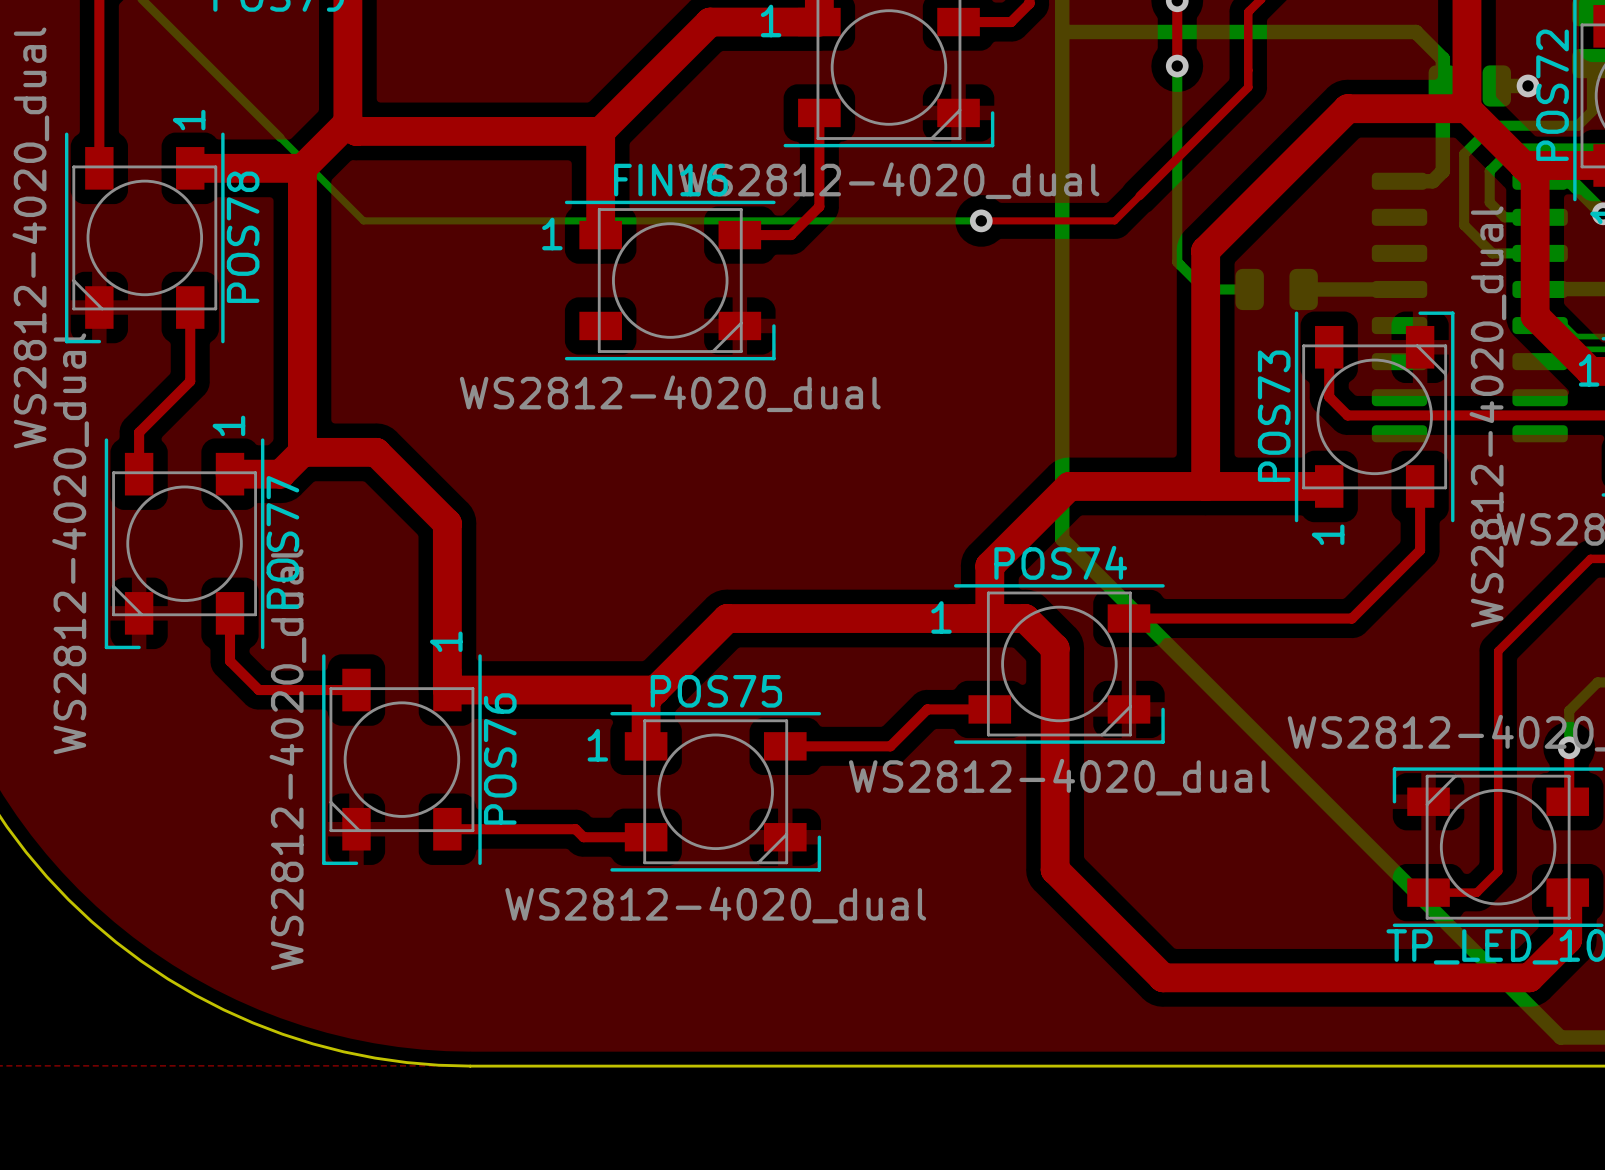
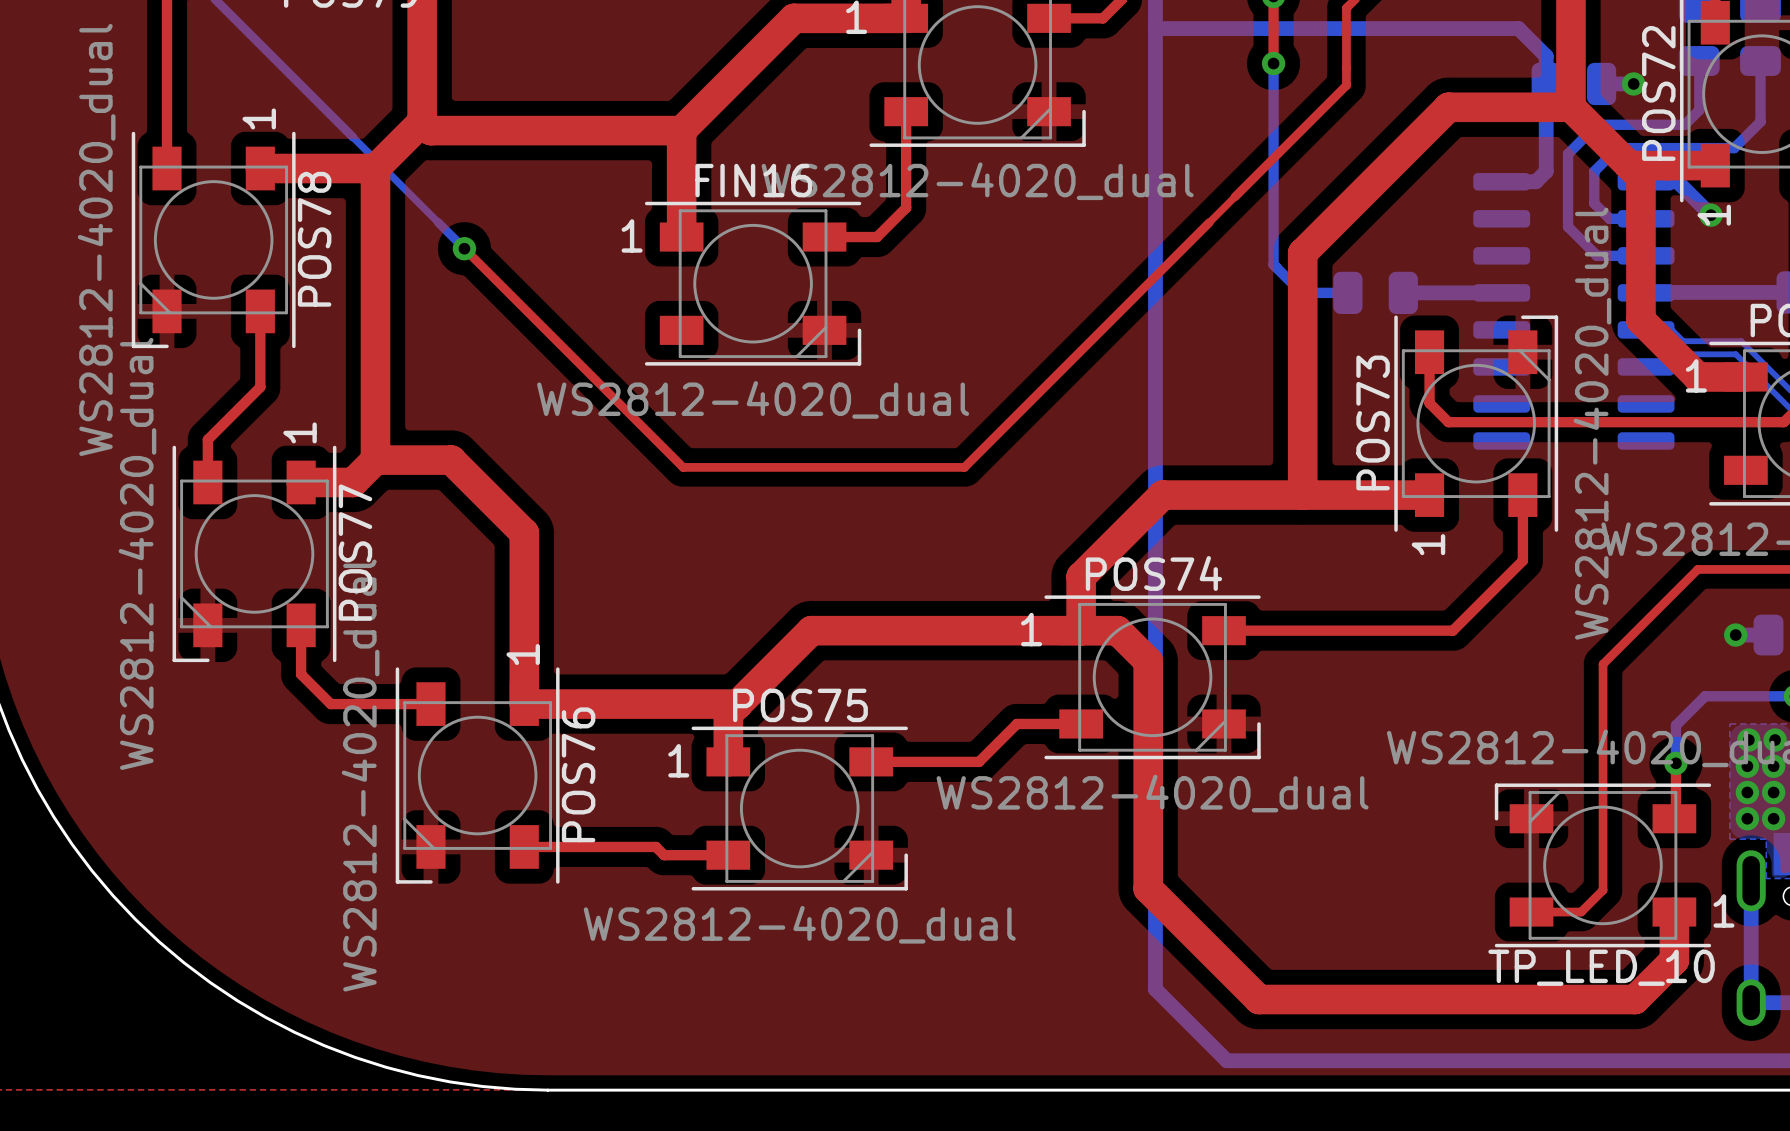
bottom track: (363, 220) (981, 220) -> (438, 222) (464, 248)
top track: (981, 220) (1114, 220) -> (464, 248) (683, 467) (964, 467) (1209, 222)
via: (981, 220) -> none
via: none -> (464, 248)
bottom track: (1062, 539) (1560, 1037) -> (1155, 549) (1155, 989) (1226, 1060) (1667, 1060)

